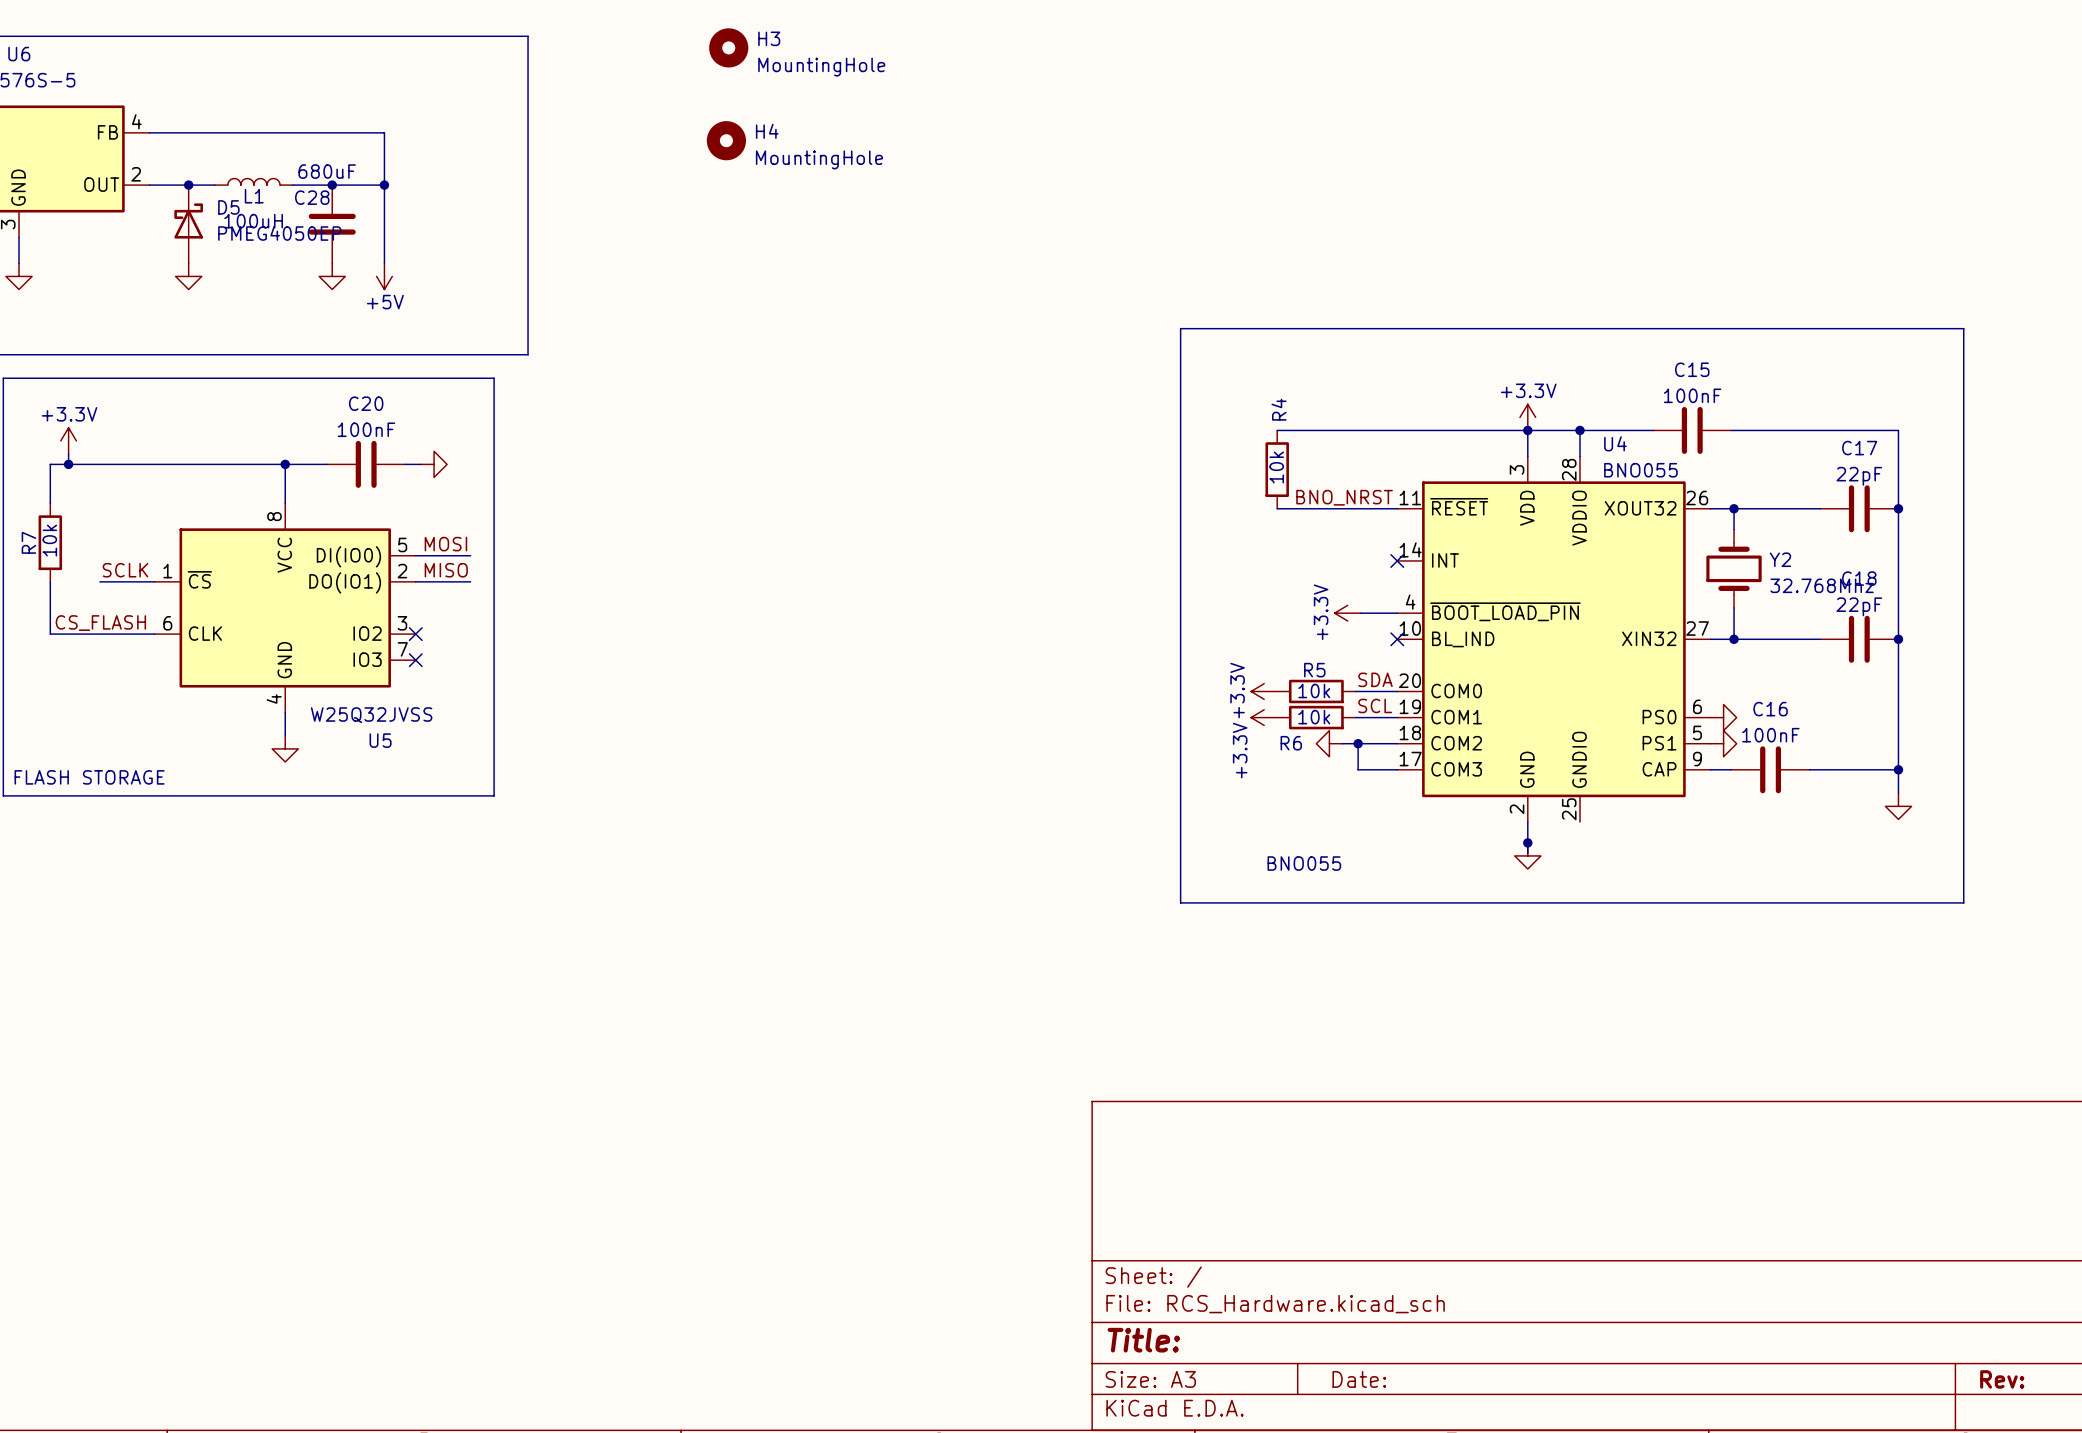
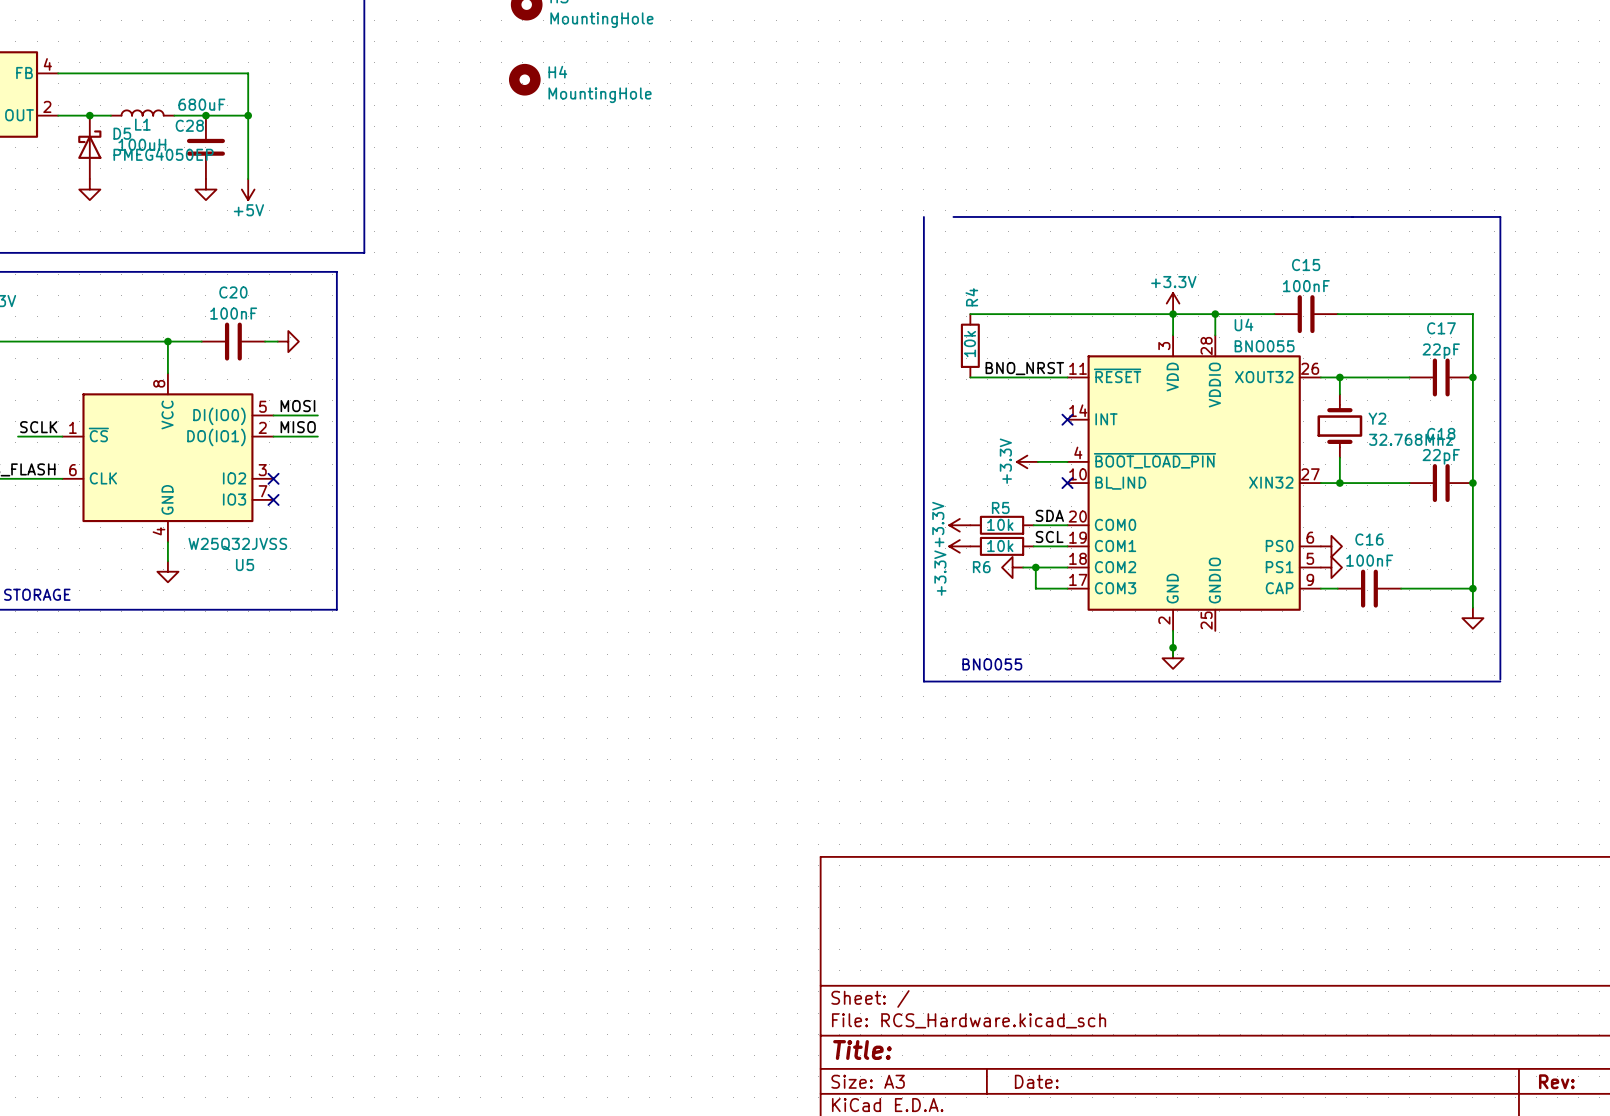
line: none -> (923, 216) (923, 681) (1500, 681)
line: none -> (953, 216) (1500, 216) (1500, 679)
line: (1180, 328) (1963, 328) (1963, 902) (1180, 902) (1180, 328) -> none

